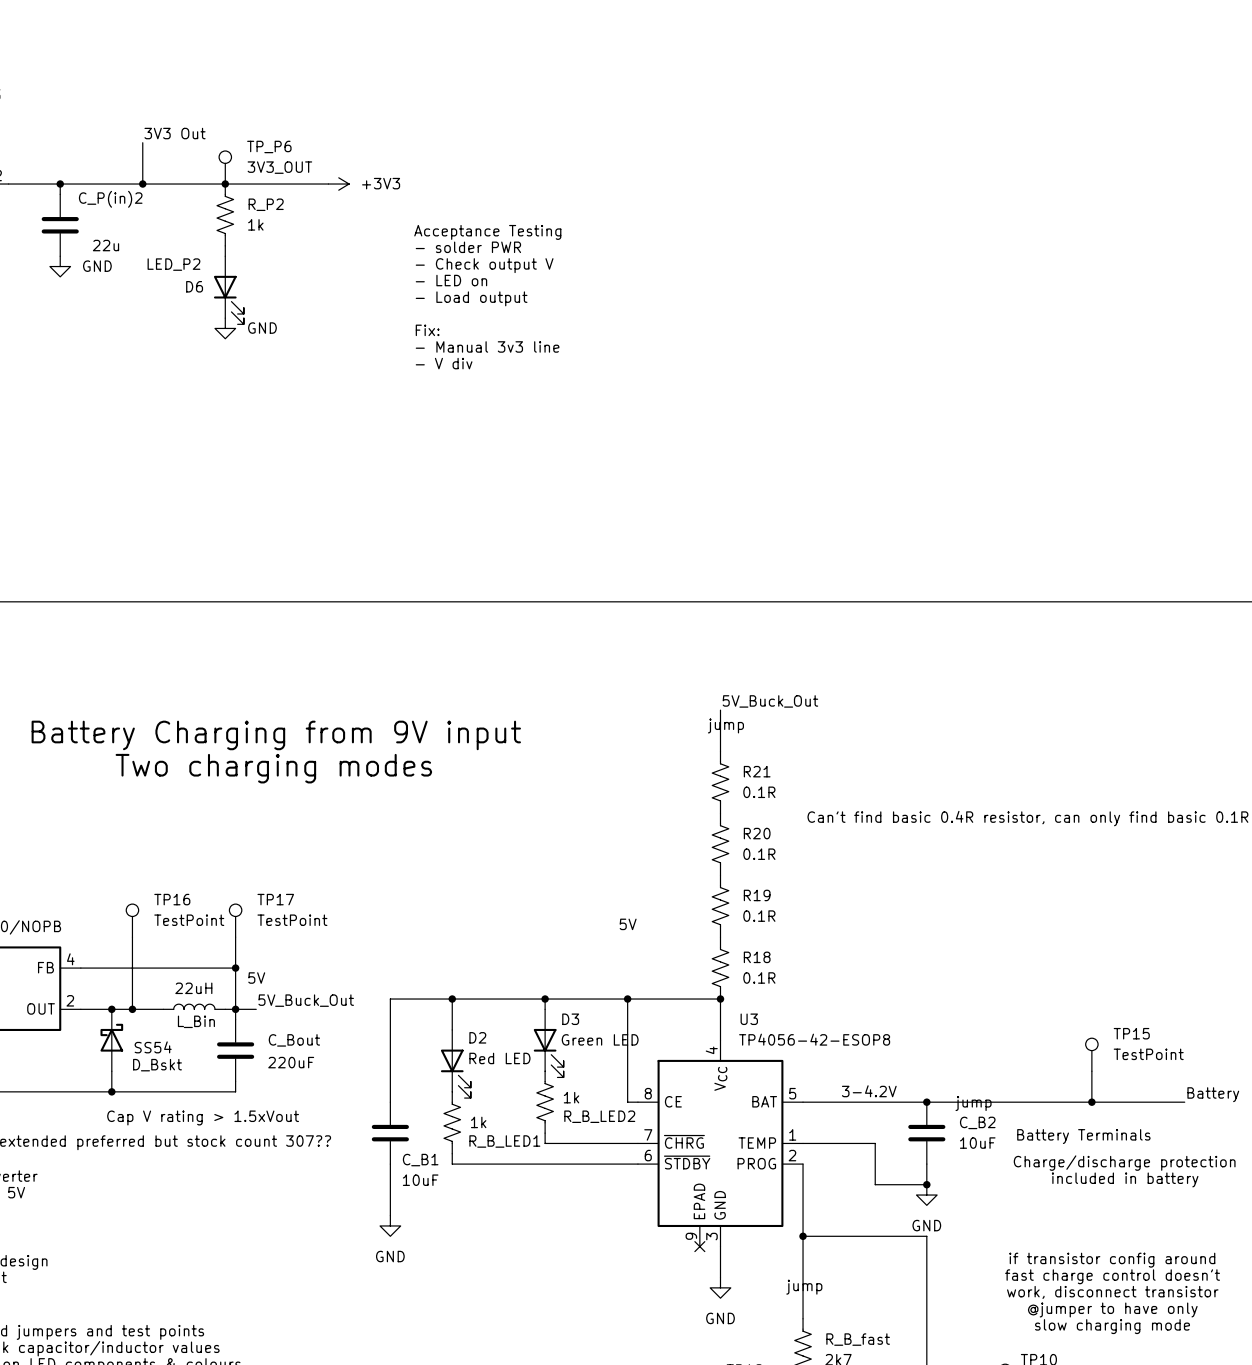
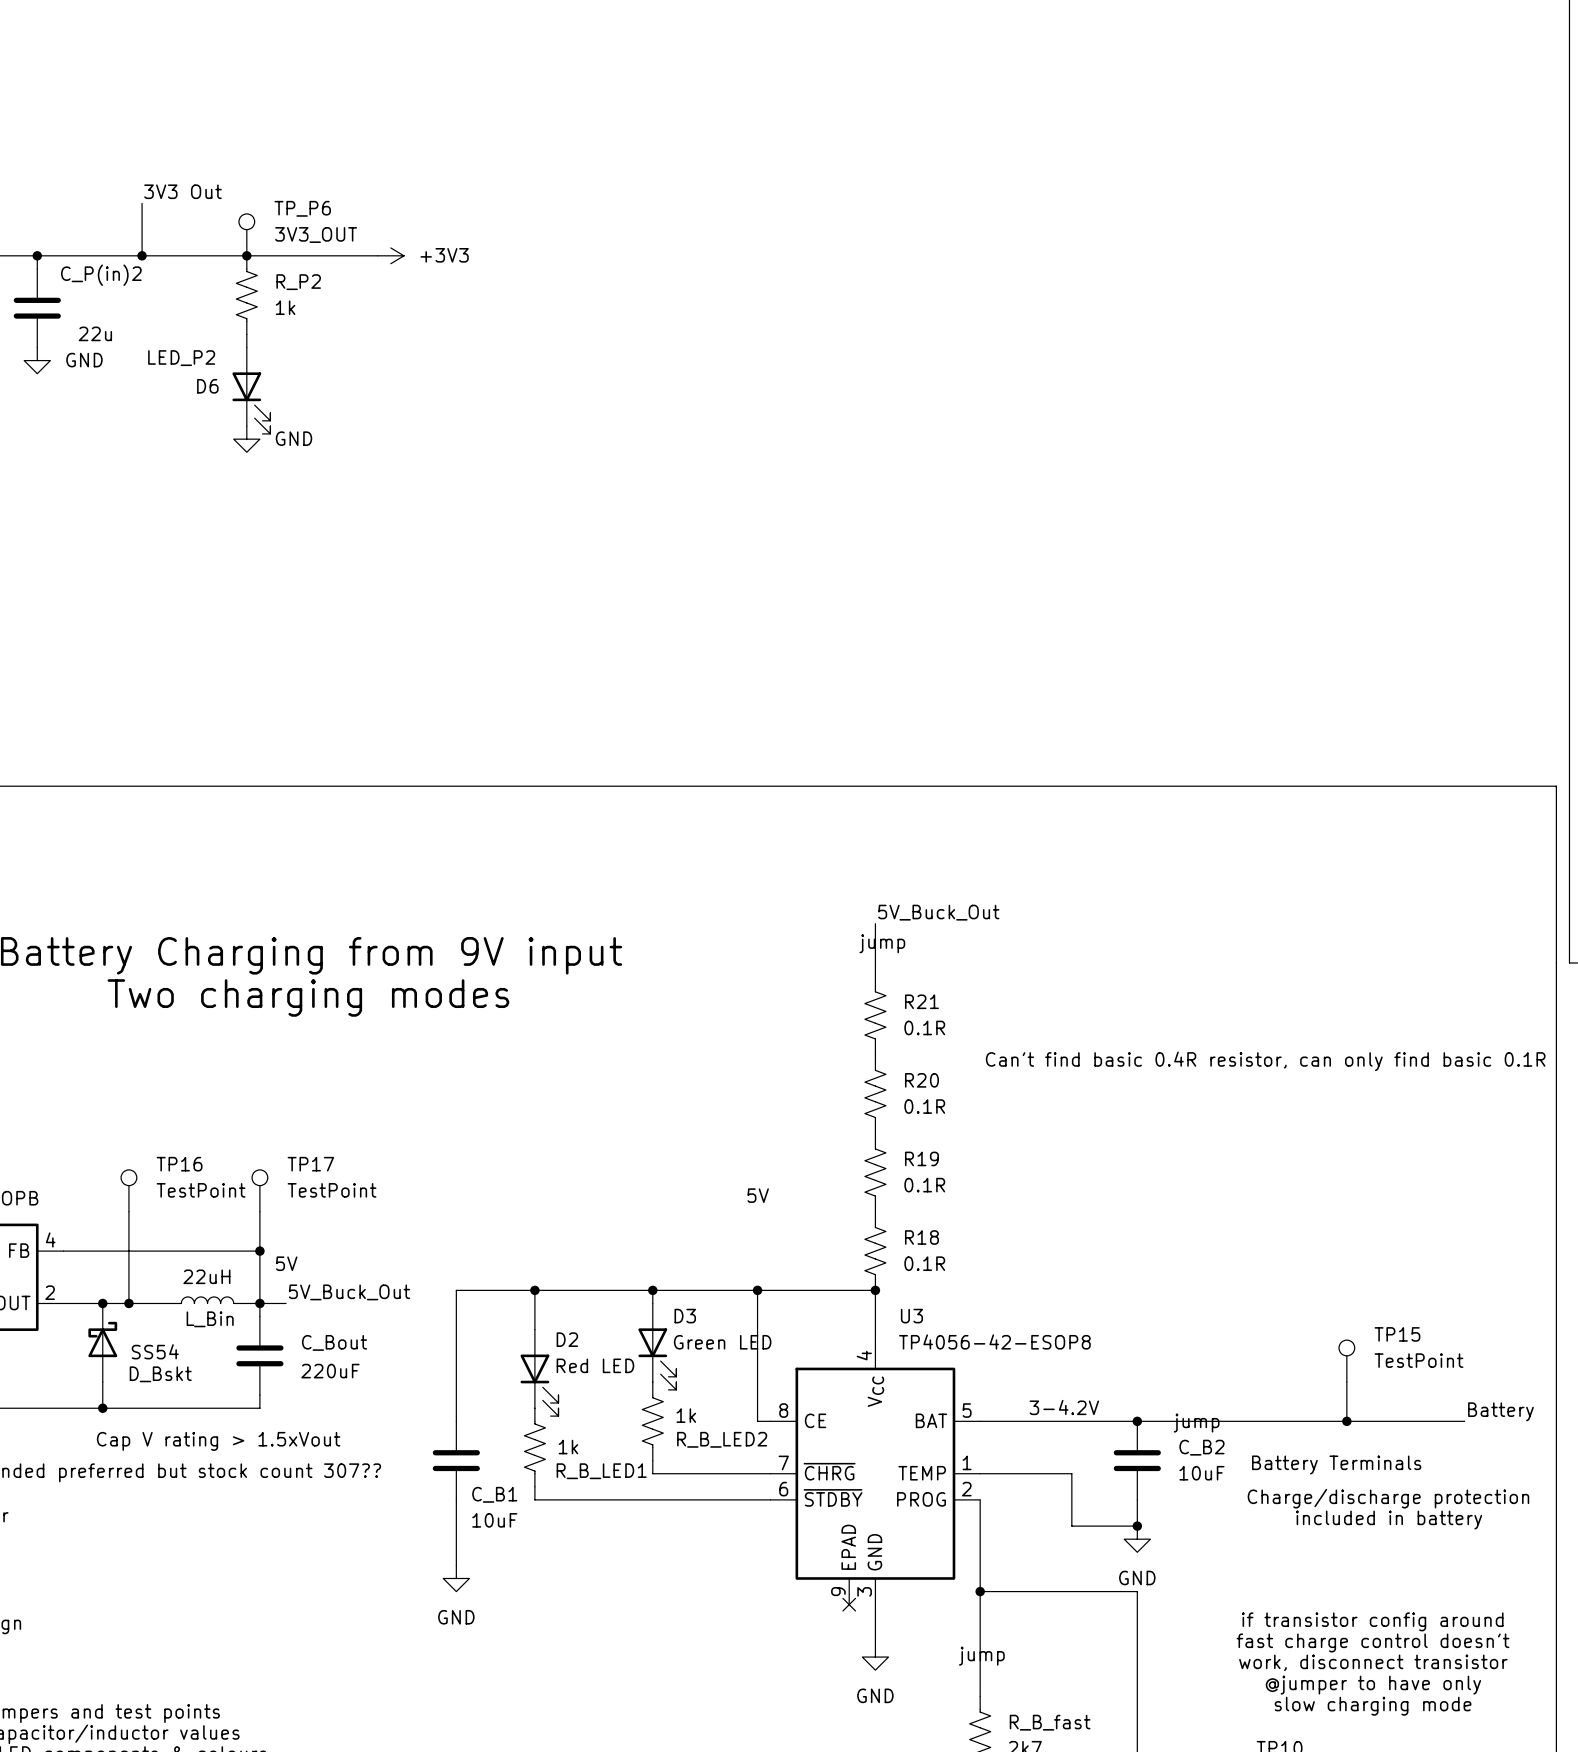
text: Acceptance Testing (487, 232) -> none
text: - solder PWR (468, 247) -> none
text: - Check output V (484, 265) -> none
text: - LED on (451, 280) -> none
text: - Load output (471, 298) -> none
text: Fix: (427, 330) -> none
text: - Manual 3v3 line (487, 346) -> none
text: - V div (444, 363) -> none

